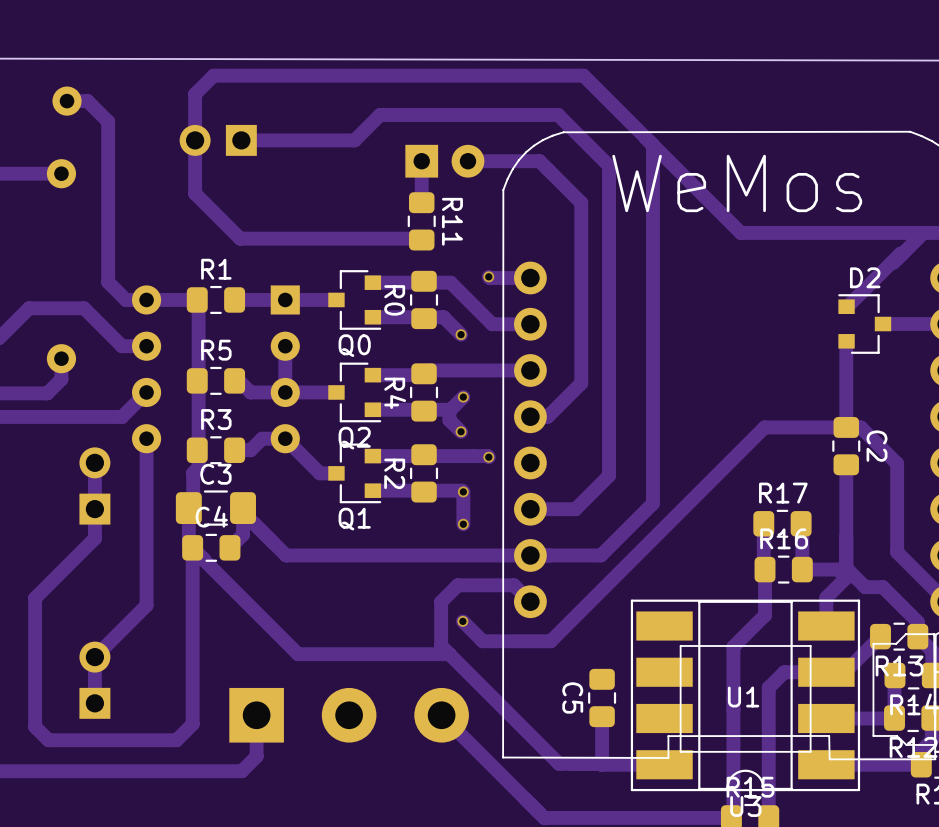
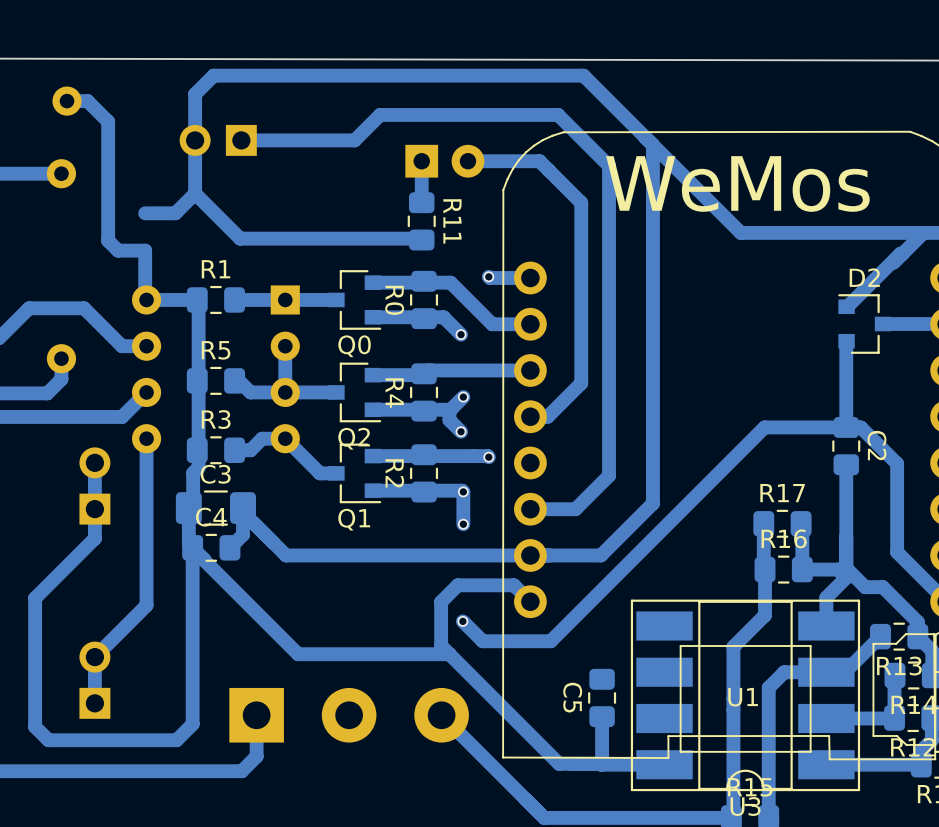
track: none -> (195, 193) (175, 213) (145, 213)
track: (108, 240) (108, 282) (125, 299) (145, 299) -> (108, 240) (118, 250) (145, 250) (146, 299)

